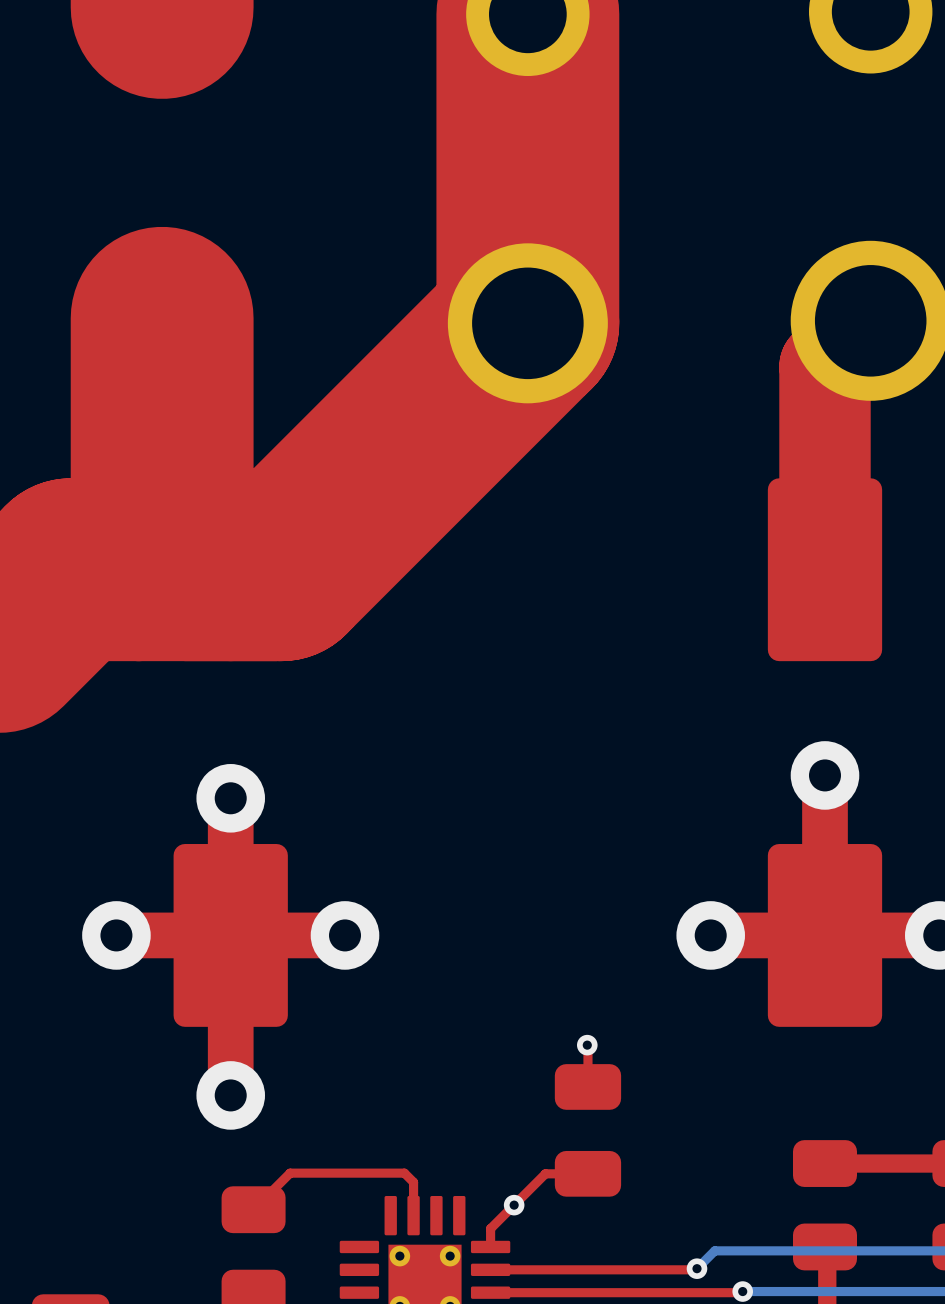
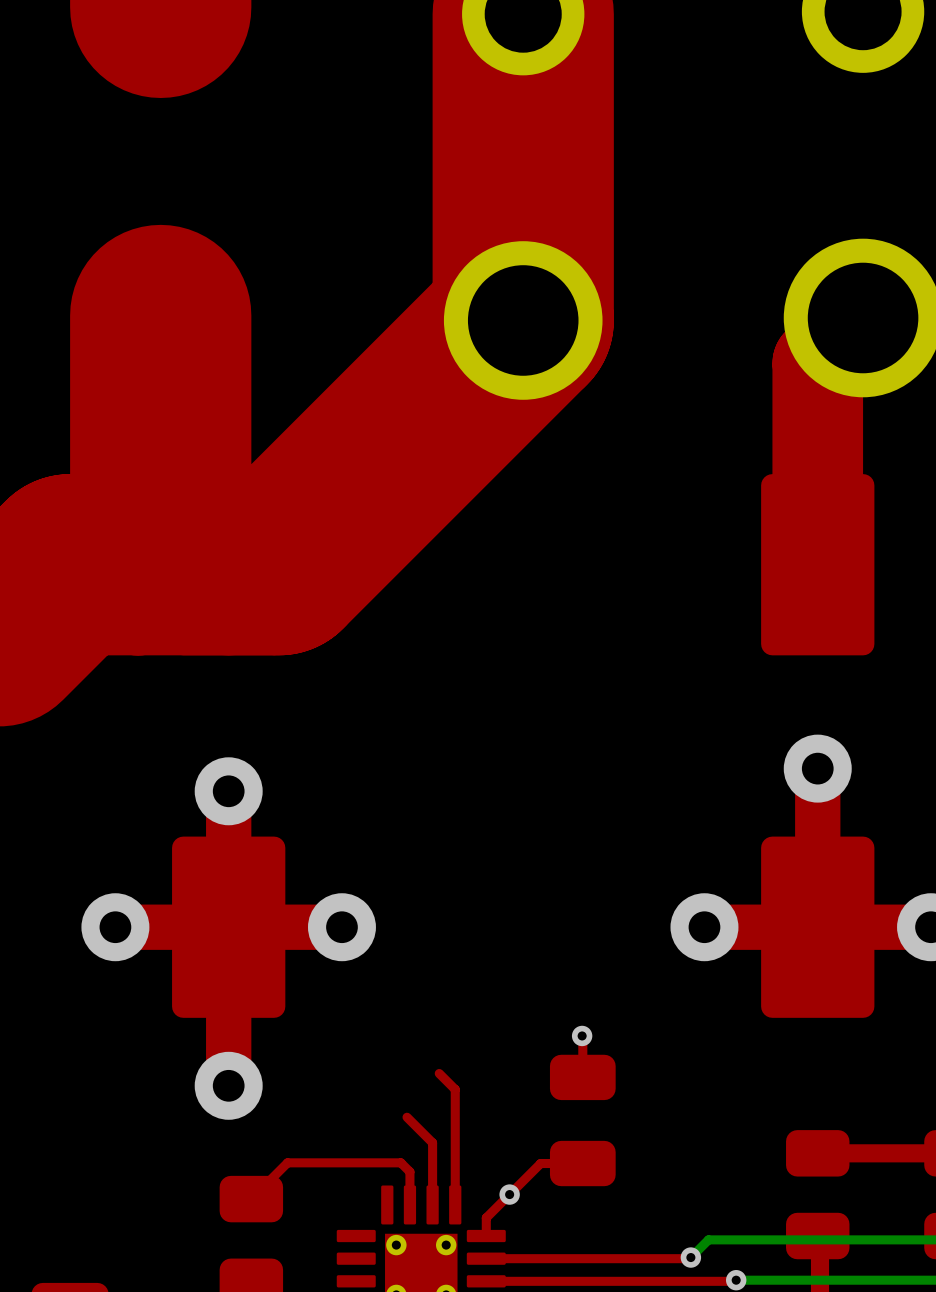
top track: none -> (439, 1073) (455, 1089) (455, 1204)
top track: none -> (407, 1117) (432, 1142) (432, 1204)

